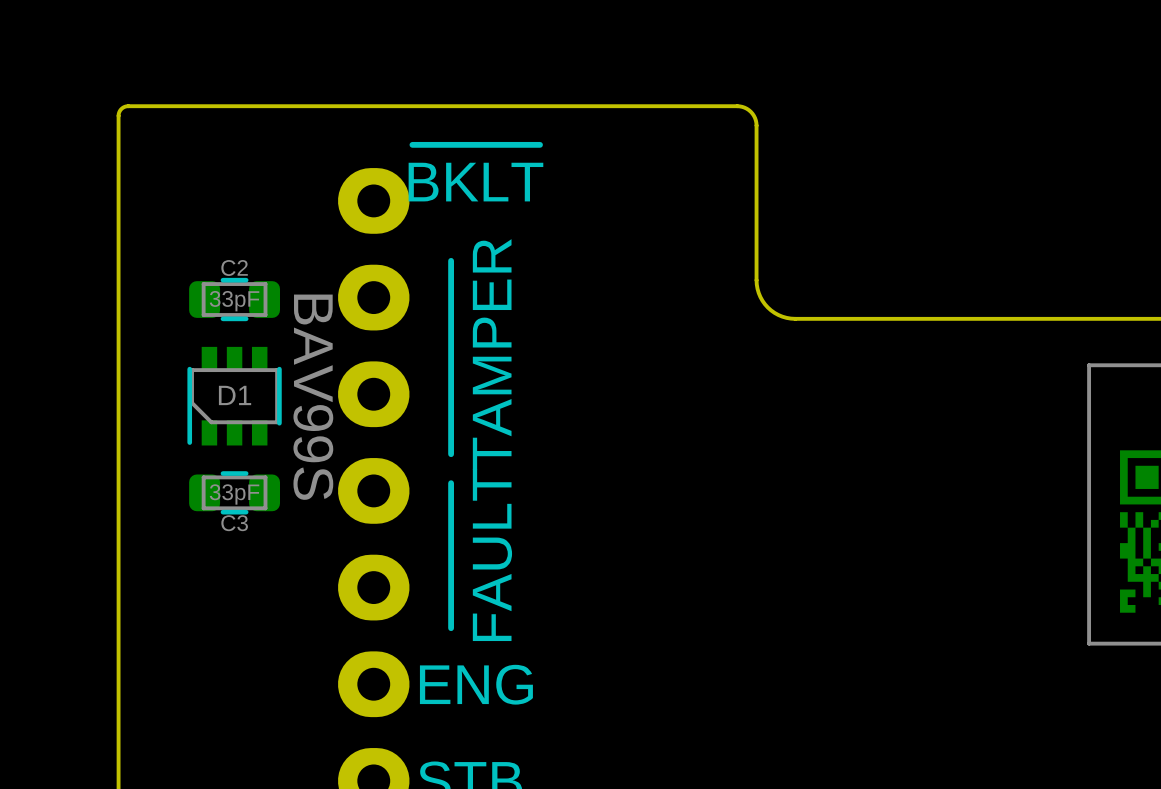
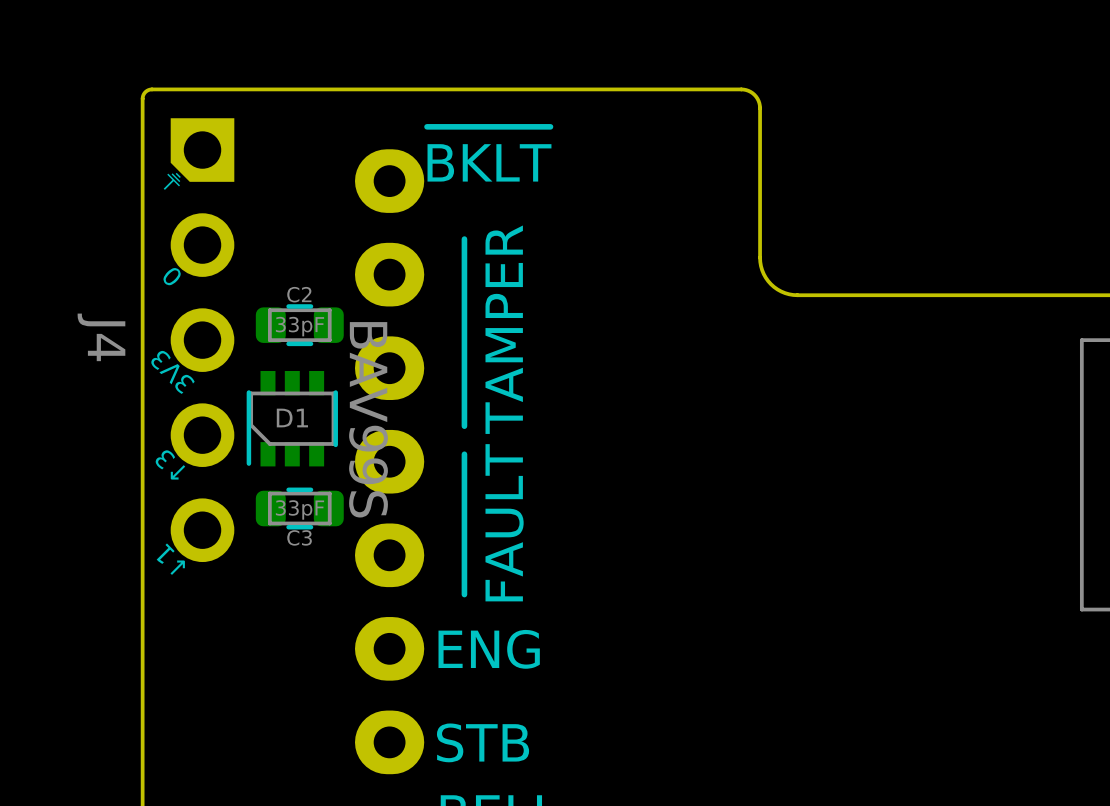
C2 position: (234, 299) -> (299, 325)
J4: none -> (202, 340)
D1 position: (234, 396) -> (292, 418)
C3 position: (234, 492) -> (299, 508)

